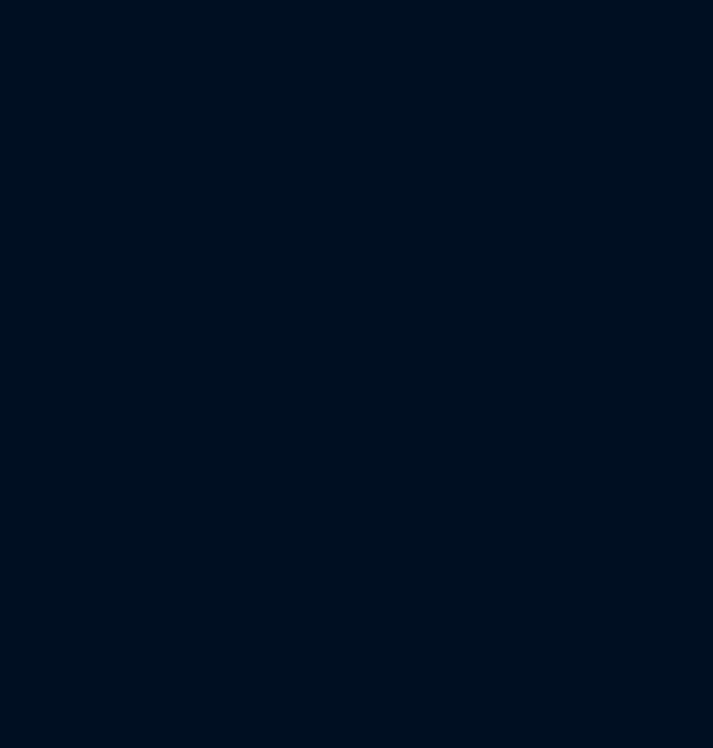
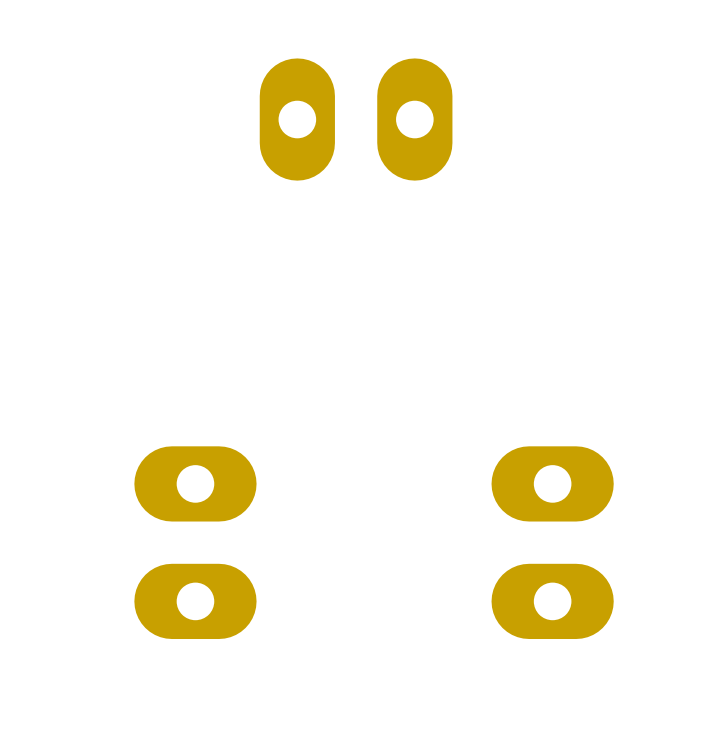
part: none -> (356, 119)
part: none -> (195, 542)
part: none -> (552, 542)

